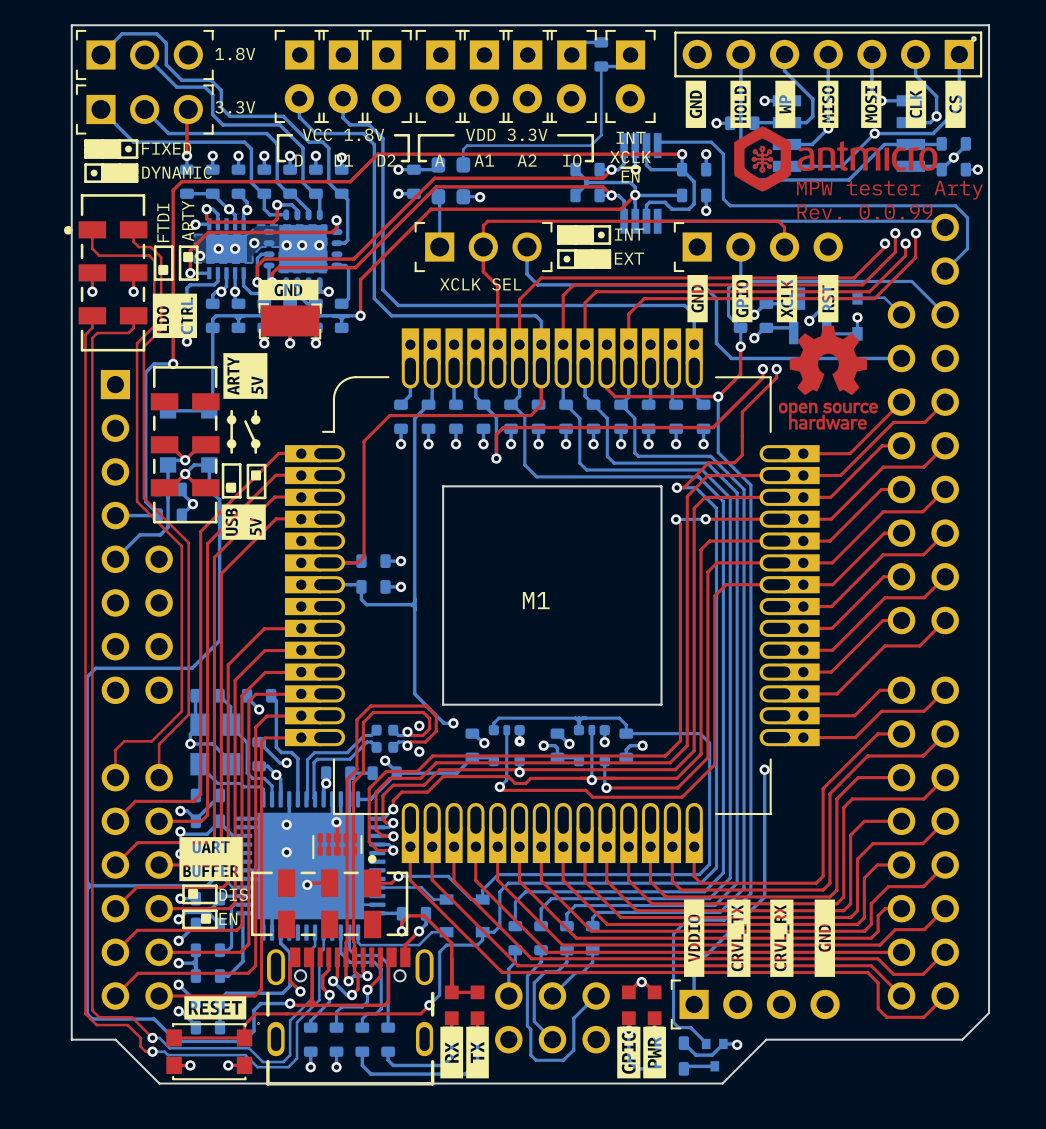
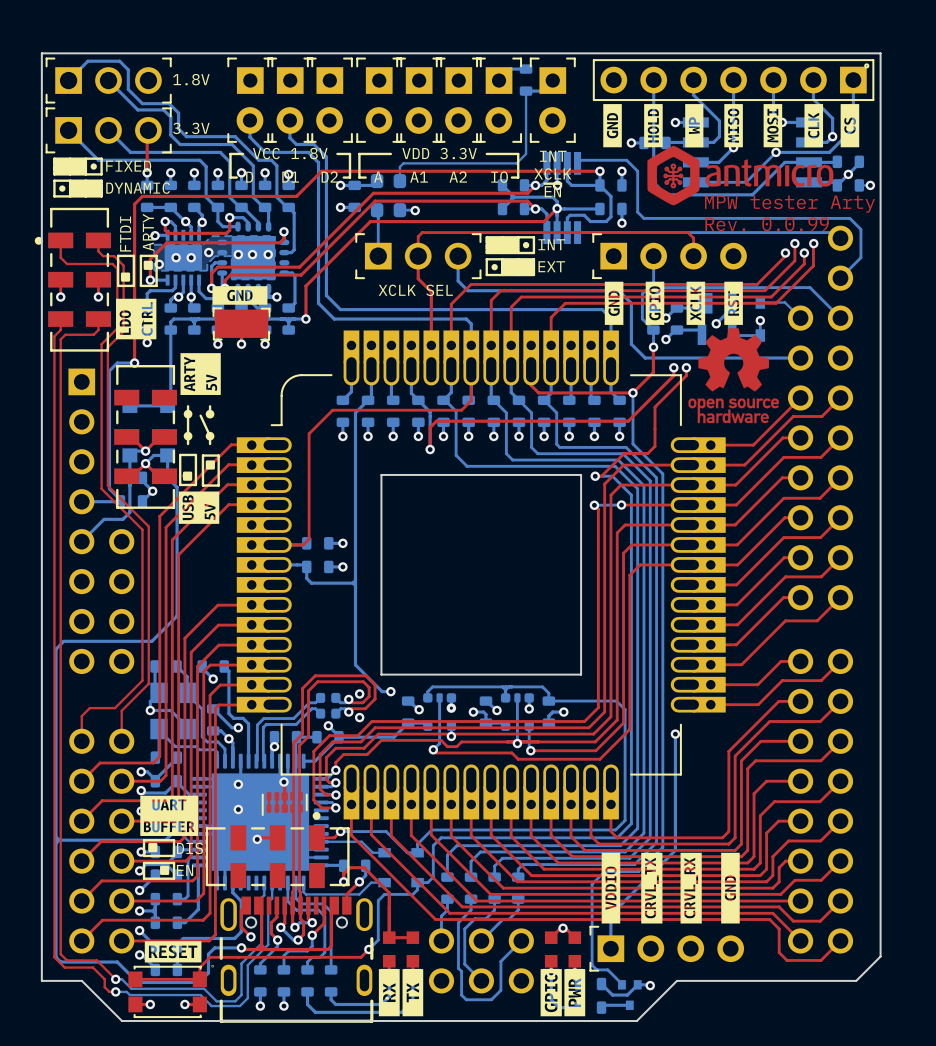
M1: (536, 600) -> none

